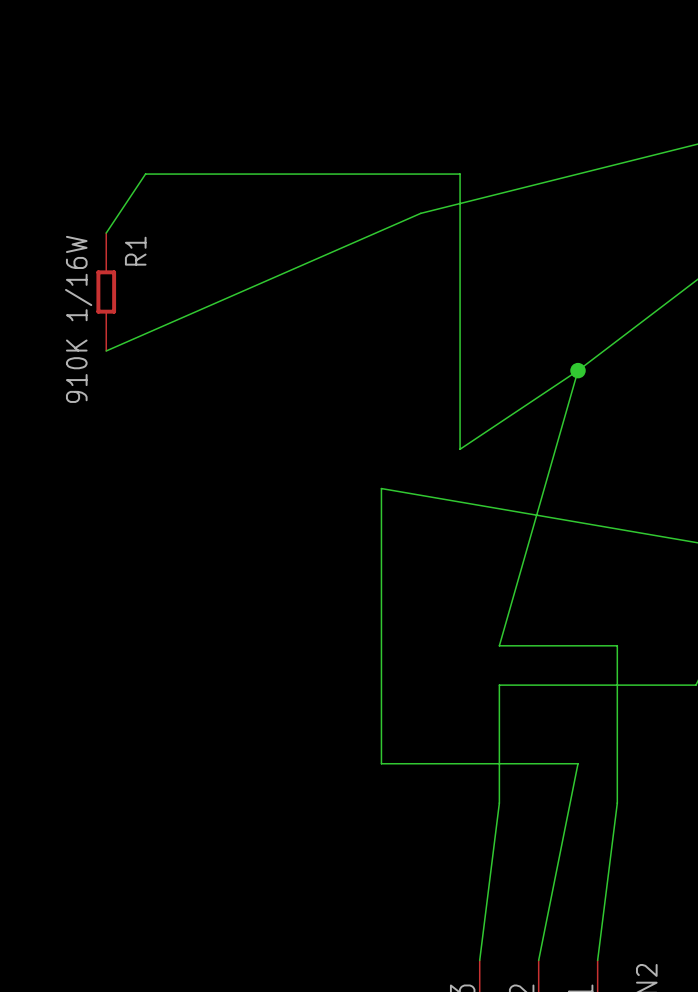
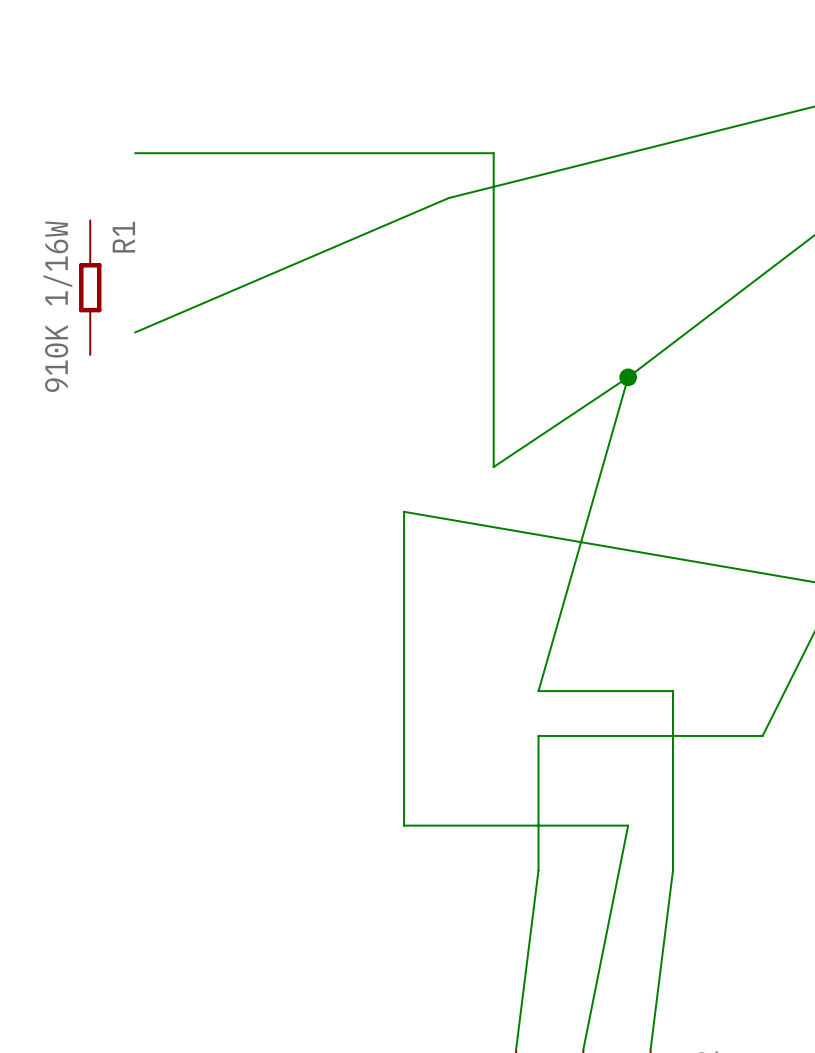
wire: (145, 174) (106, 233) -> none
wire: (420, 213) (106, 350) -> (448, 198) (135, 332)

